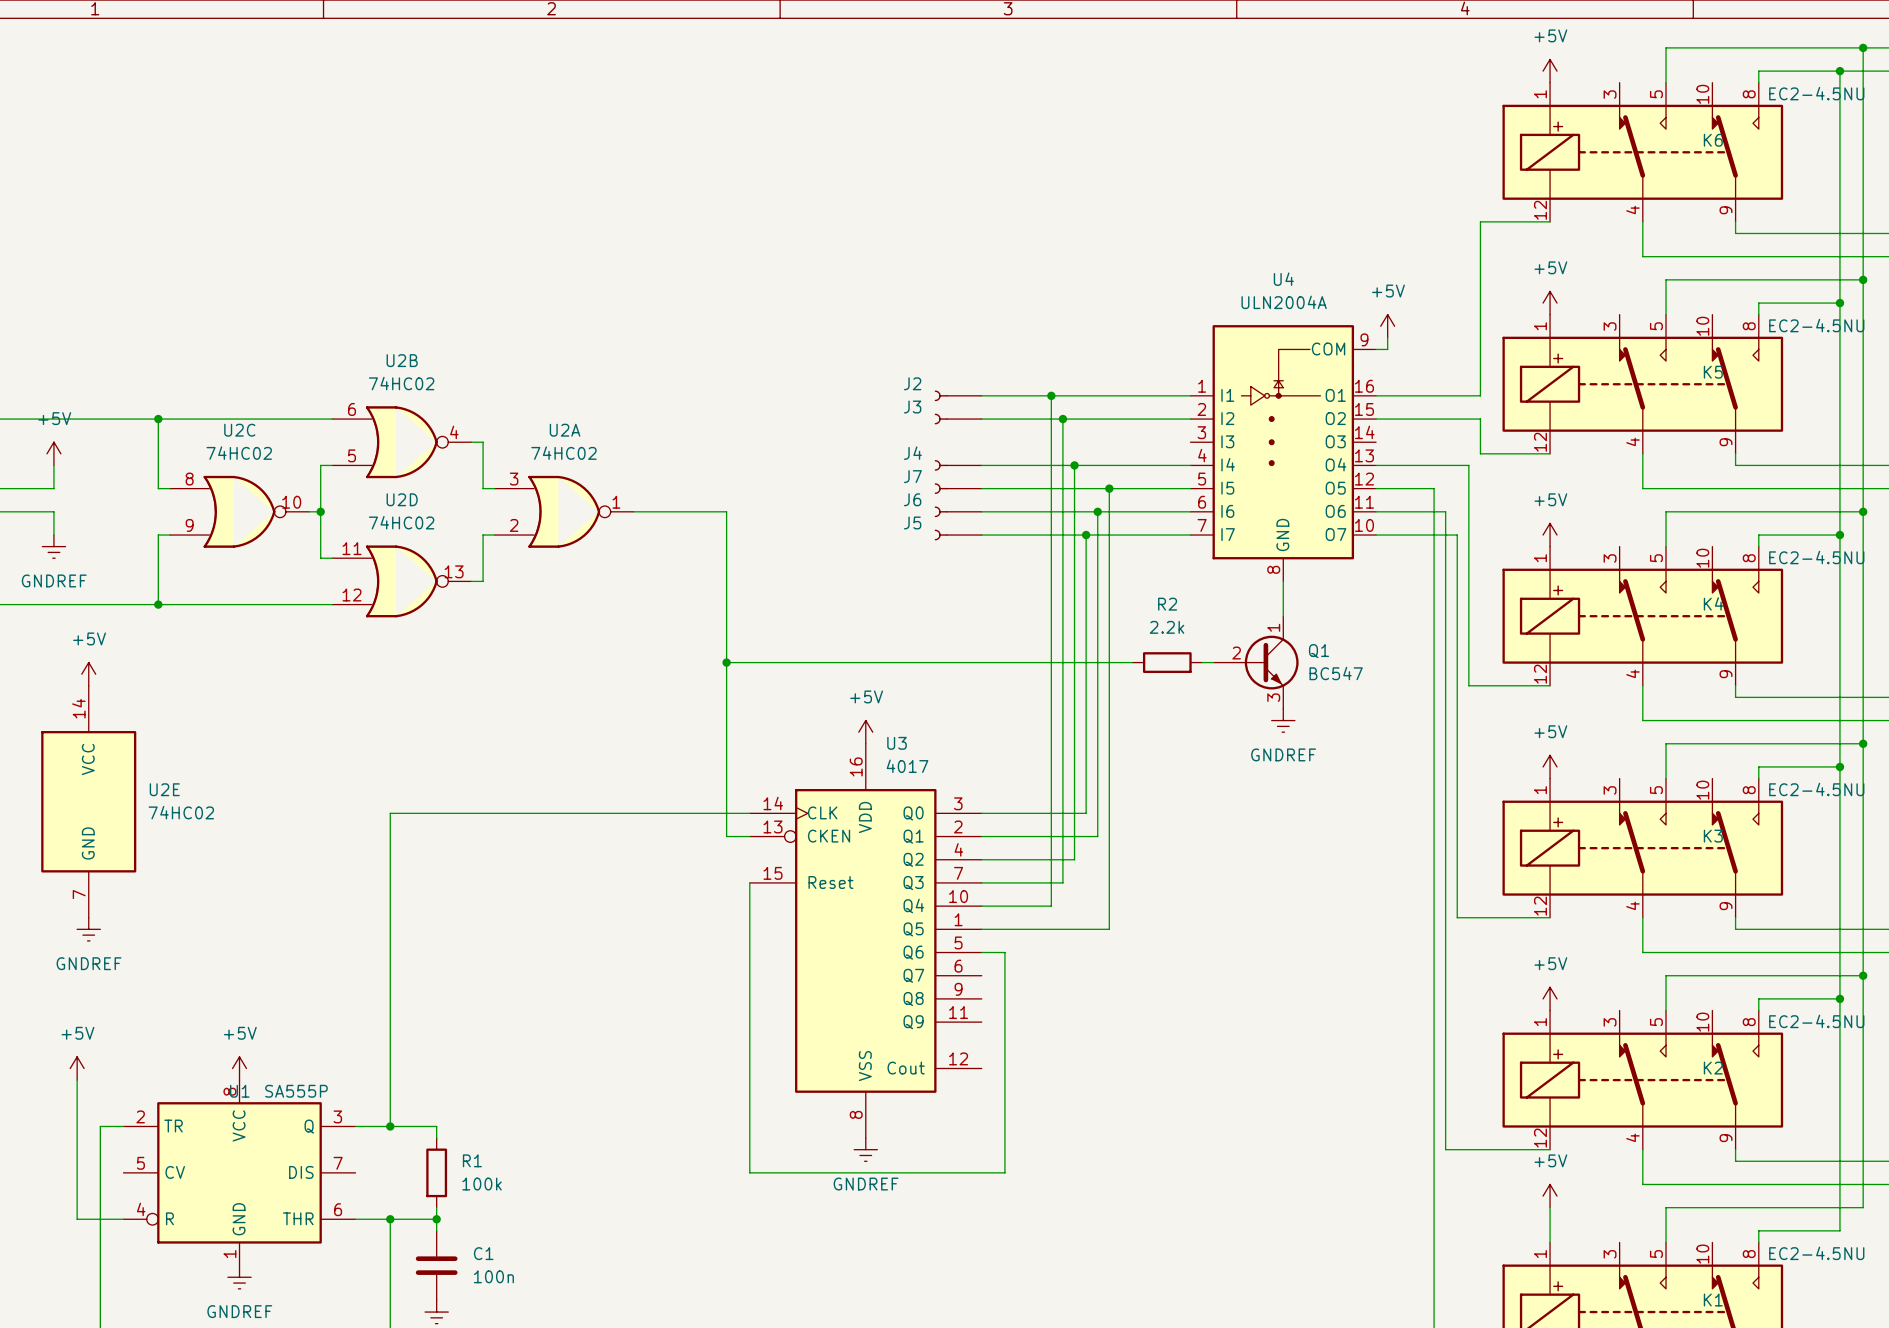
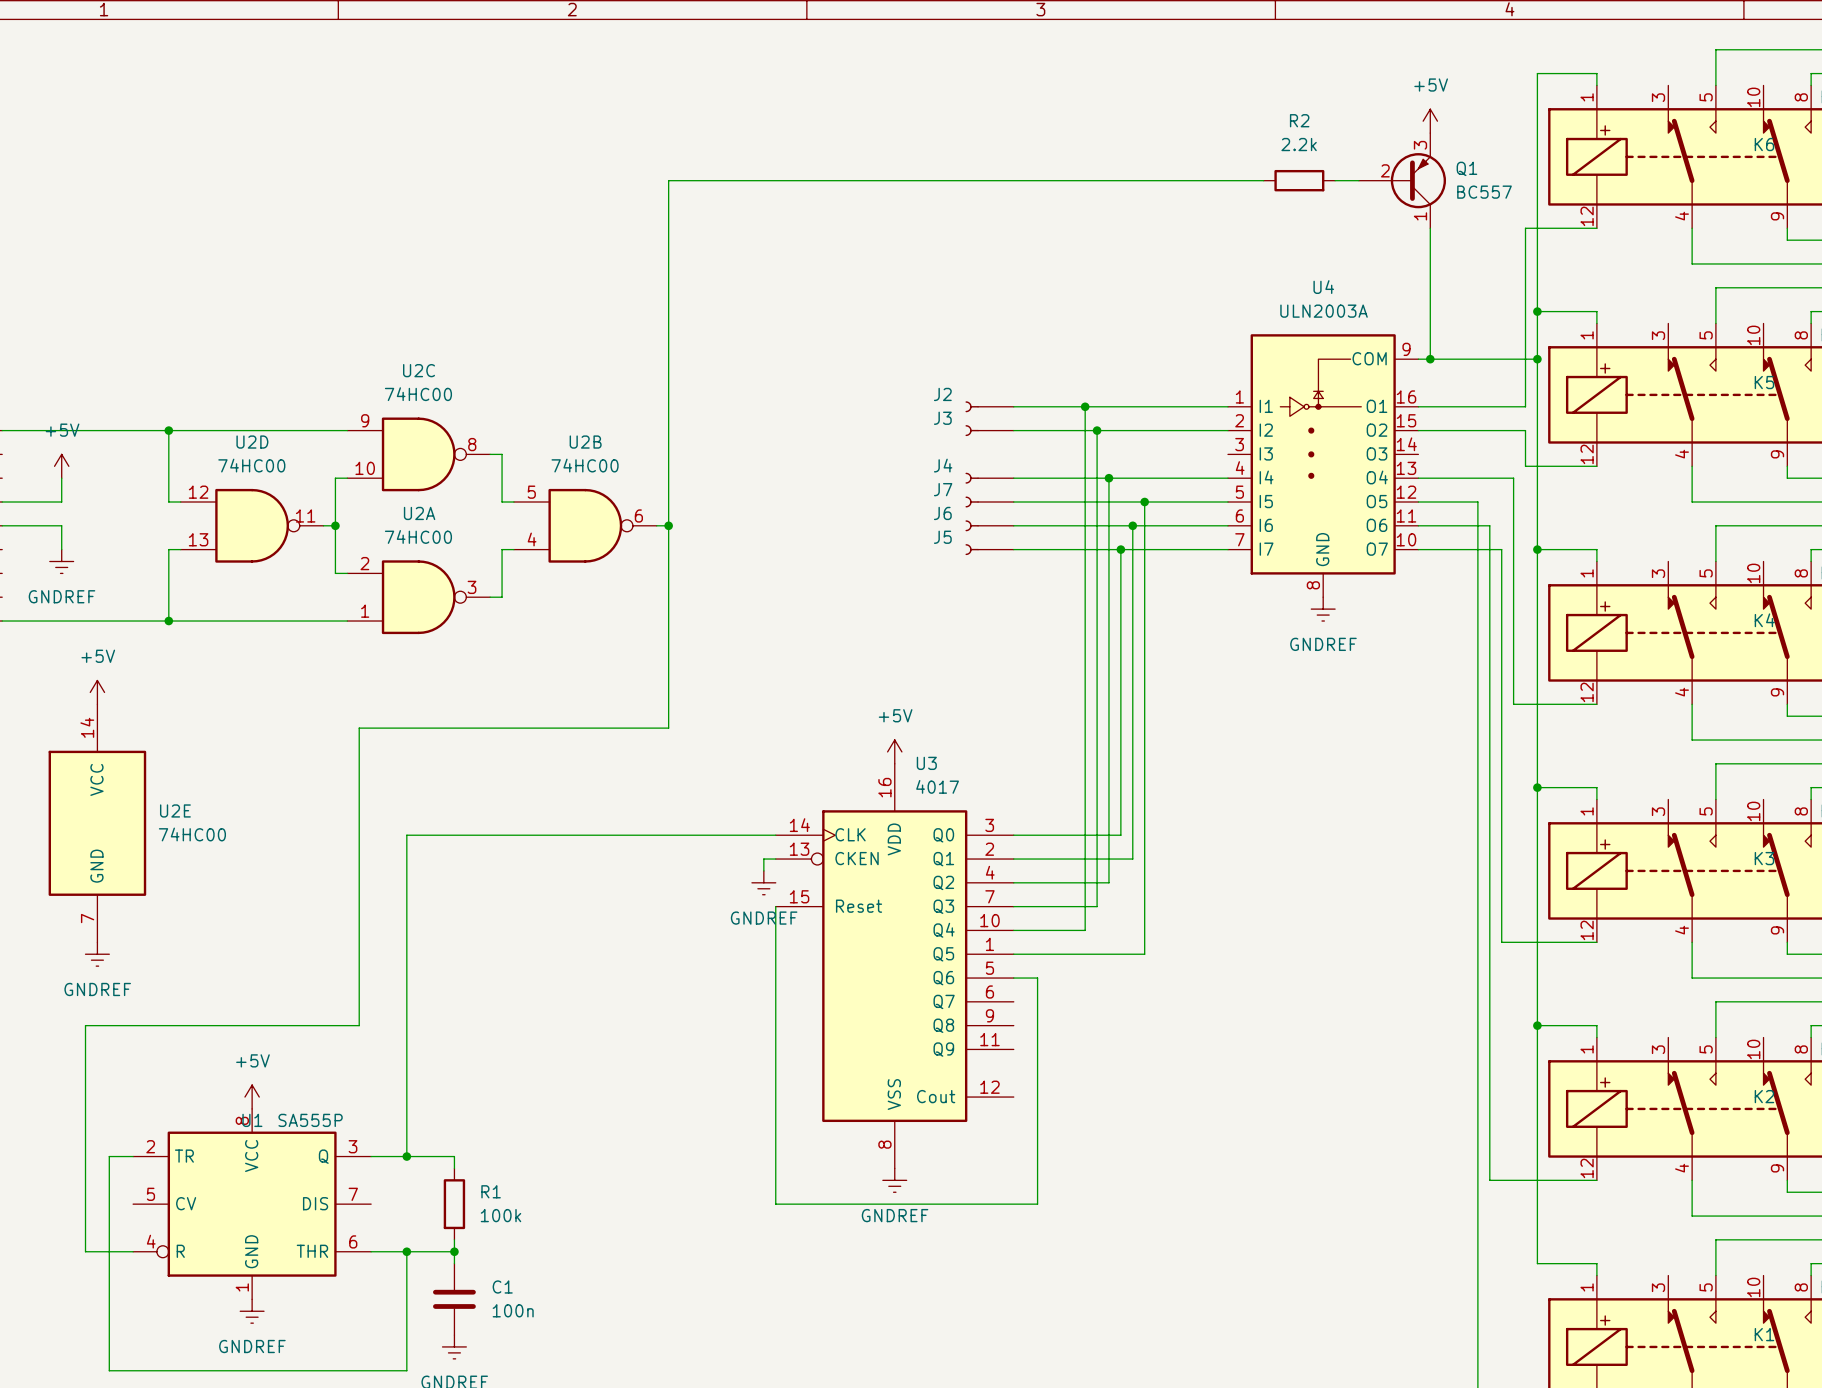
power symbol: +5V (1550, 71) -> none
power symbol: none -> +5V (1430, 121)
wire: none -> (1263, 180) (668, 180) (668, 728) (359, 728) (359, 1025) (85, 1025) (85, 1108)
wire: none -> (1335, 180) (1358, 180)
wire: none -> (1430, 228) (1430, 347)
U4 value: ULN2004A (1284, 302) -> ULN2003A (1324, 311)
wire: none -> (1537, 311) (1596, 311) (1596, 323)
junction: none -> (1537, 311)
power symbol: +5V (1550, 303) -> none
power symbol: +5V (1387, 326) -> none
wire: none -> (1430, 359) (1537, 359)
junction: none -> (1430, 359)
junction: none -> (1537, 359)
U2B value: 74HC02 (401, 383) -> 74HC00 (585, 465)
U2B symbol: [332, 406, 472, 479] -> [513, 488, 657, 563]
U2C value: 74HC02 (239, 453) -> 74HC00 (418, 394)
U2A value: 74HC02 (563, 453) -> 74HC00 (418, 536)
U2C symbol: [169, 475, 310, 548] -> [347, 417, 491, 492]
U2A symbol: [494, 475, 634, 548] -> [347, 560, 491, 635]
wire: (645, 511) (726, 511) (726, 836) (738, 836) -> (763, 870) (763, 859)
junction: none -> (668, 525)
U2D value: 74HC02 (401, 522) -> 74HC00 (251, 465)
wire: none -> (1537, 549) (1596, 549) (1596, 561)
junction: none -> (1537, 549)
power symbol: +5V (1550, 535) -> none
U2D symbol: [332, 545, 472, 618] -> [180, 488, 324, 563]
wire: (1283, 581) (1283, 616) -> none
Q1 symbol: [1213, 616, 1299, 709] -> [1358, 133, 1447, 229]
wire: (726, 662) (1132, 662) -> none
junction: (726, 662) -> none
R2 position: (1167, 662) -> (1299, 180)
wire: (1202, 662) (1213, 662) -> none
Q1 value: BC547 (1336, 673) -> BC557 (1484, 192)
power symbol position: GNDREF (1283, 720) -> GNDREF (1323, 609)
wire: none -> (1537, 787) (1596, 787) (1596, 799)
junction: none -> (1537, 787)
power symbol: +5V (1550, 766) -> none
U2E value: 74HC02 (181, 812) -> 74HC00 (192, 834)
power symbol: none -> GNDREF (763, 882)
wire: none -> (1537, 1025) (1596, 1025) (1596, 1037)
junction: none -> (1537, 1025)
power symbol: +5V (1550, 998) -> none
power symbol: +5V (77, 1068) -> none
power symbol: +5V (1550, 1196) -> none
wire: (1550, 1207) (1550, 1230) -> (1596, 85) (1596, 73) (1537, 73) (1537, 1263) (1596, 1263)

